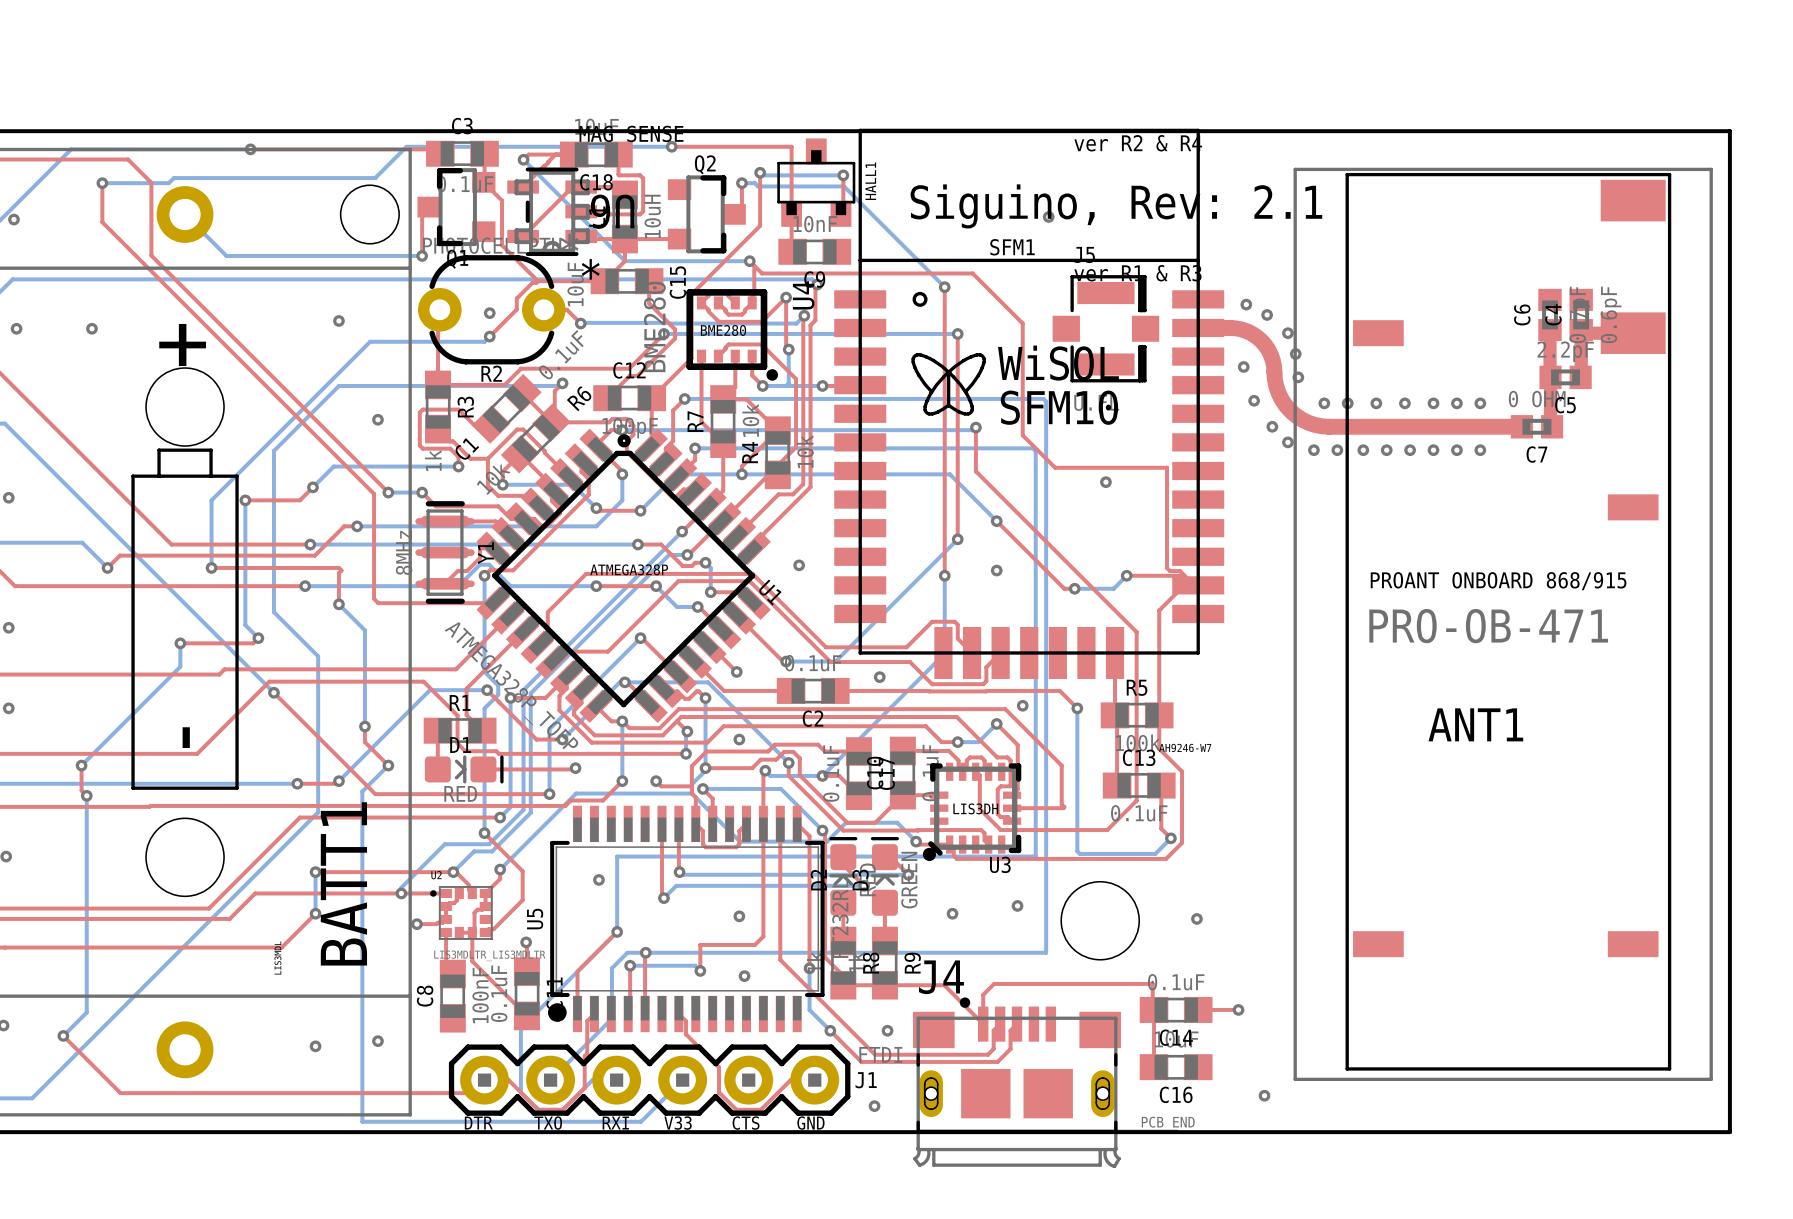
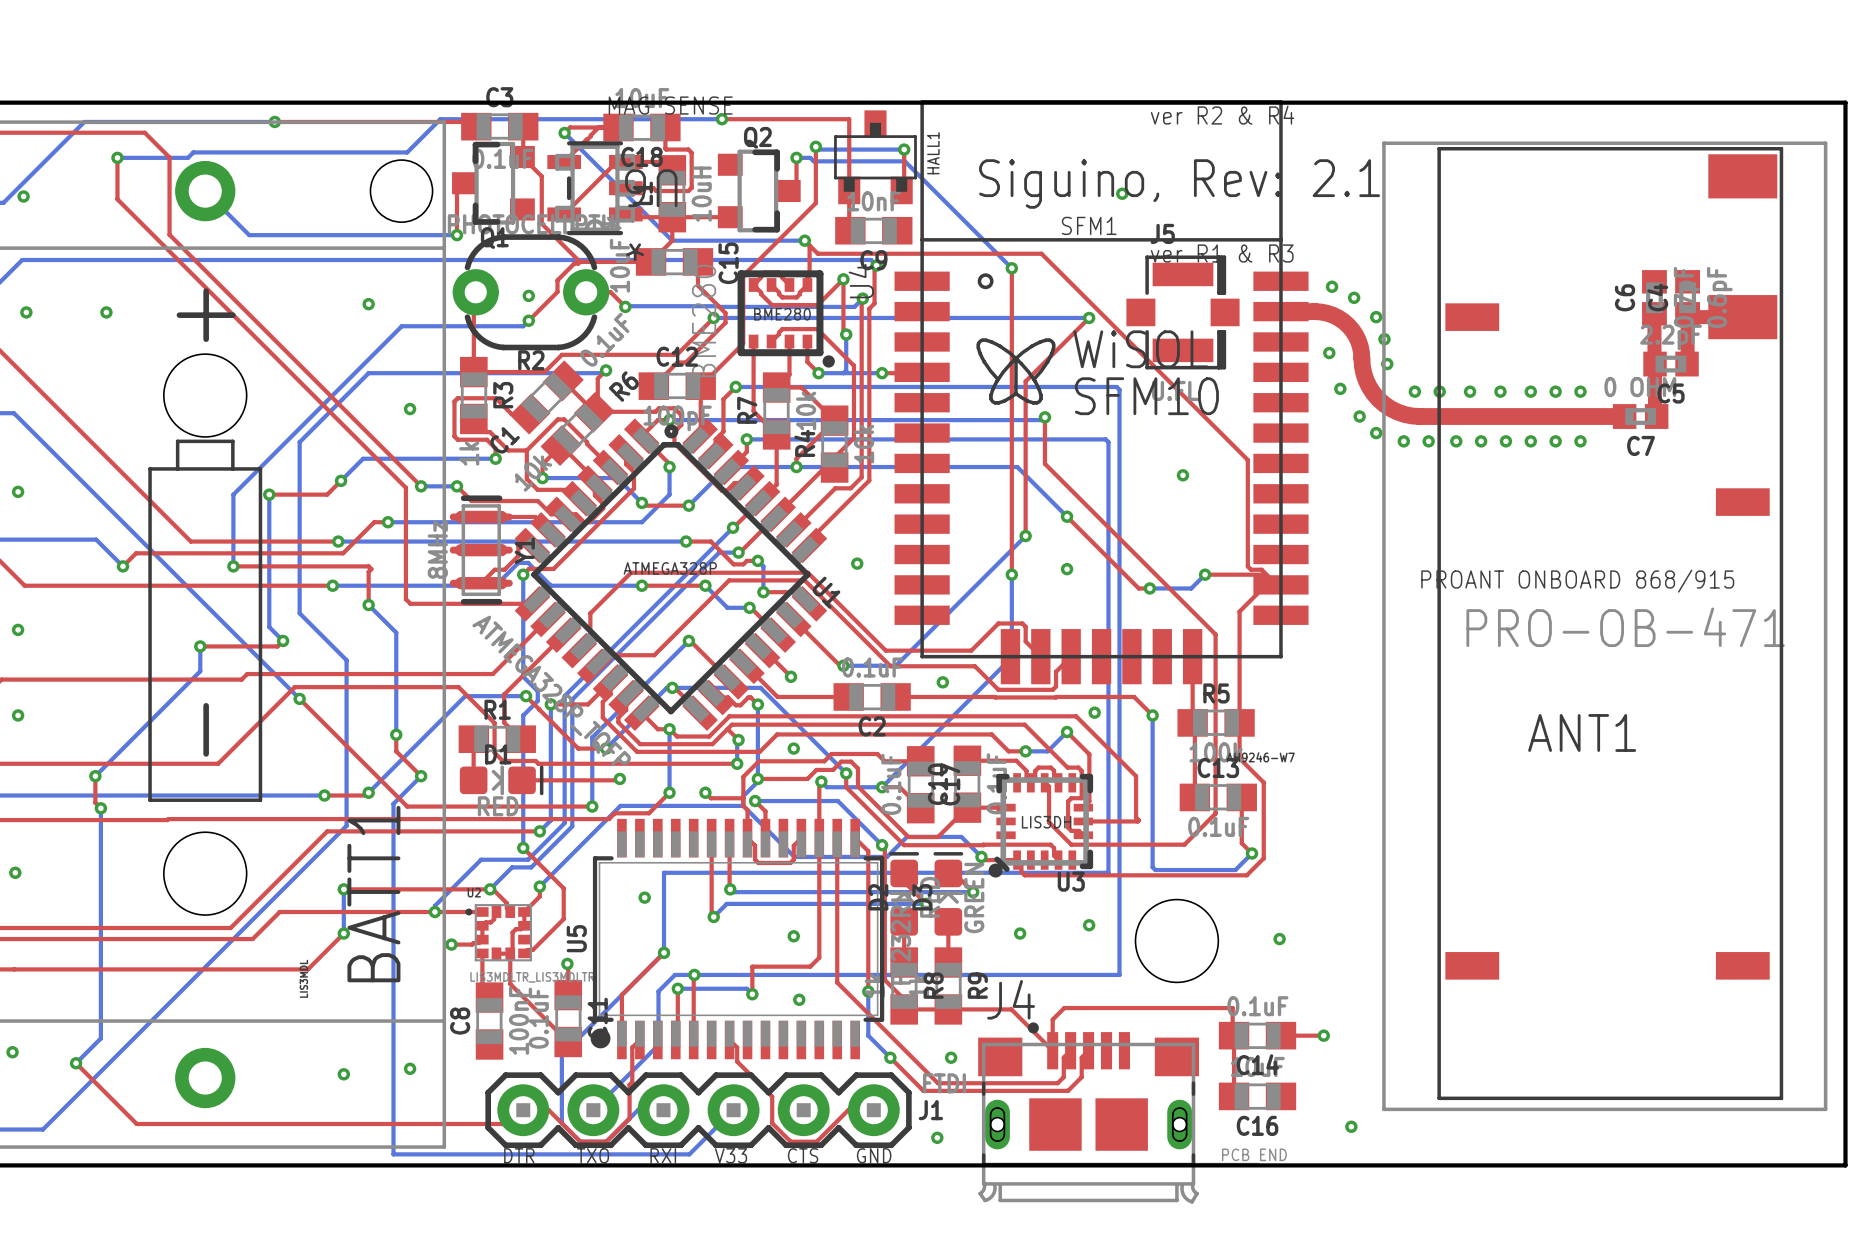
top track: (1022, 323) (1022, 435) (1055, 467) (1167, 467) -> (1094, 306) (1247, 460)
top track: (957, 333) (957, 393) -> (1089, 317) (1025, 381)
bottom track: none -> (1025, 317) (1089, 317)
via position: (957, 333) -> (1089, 317)

